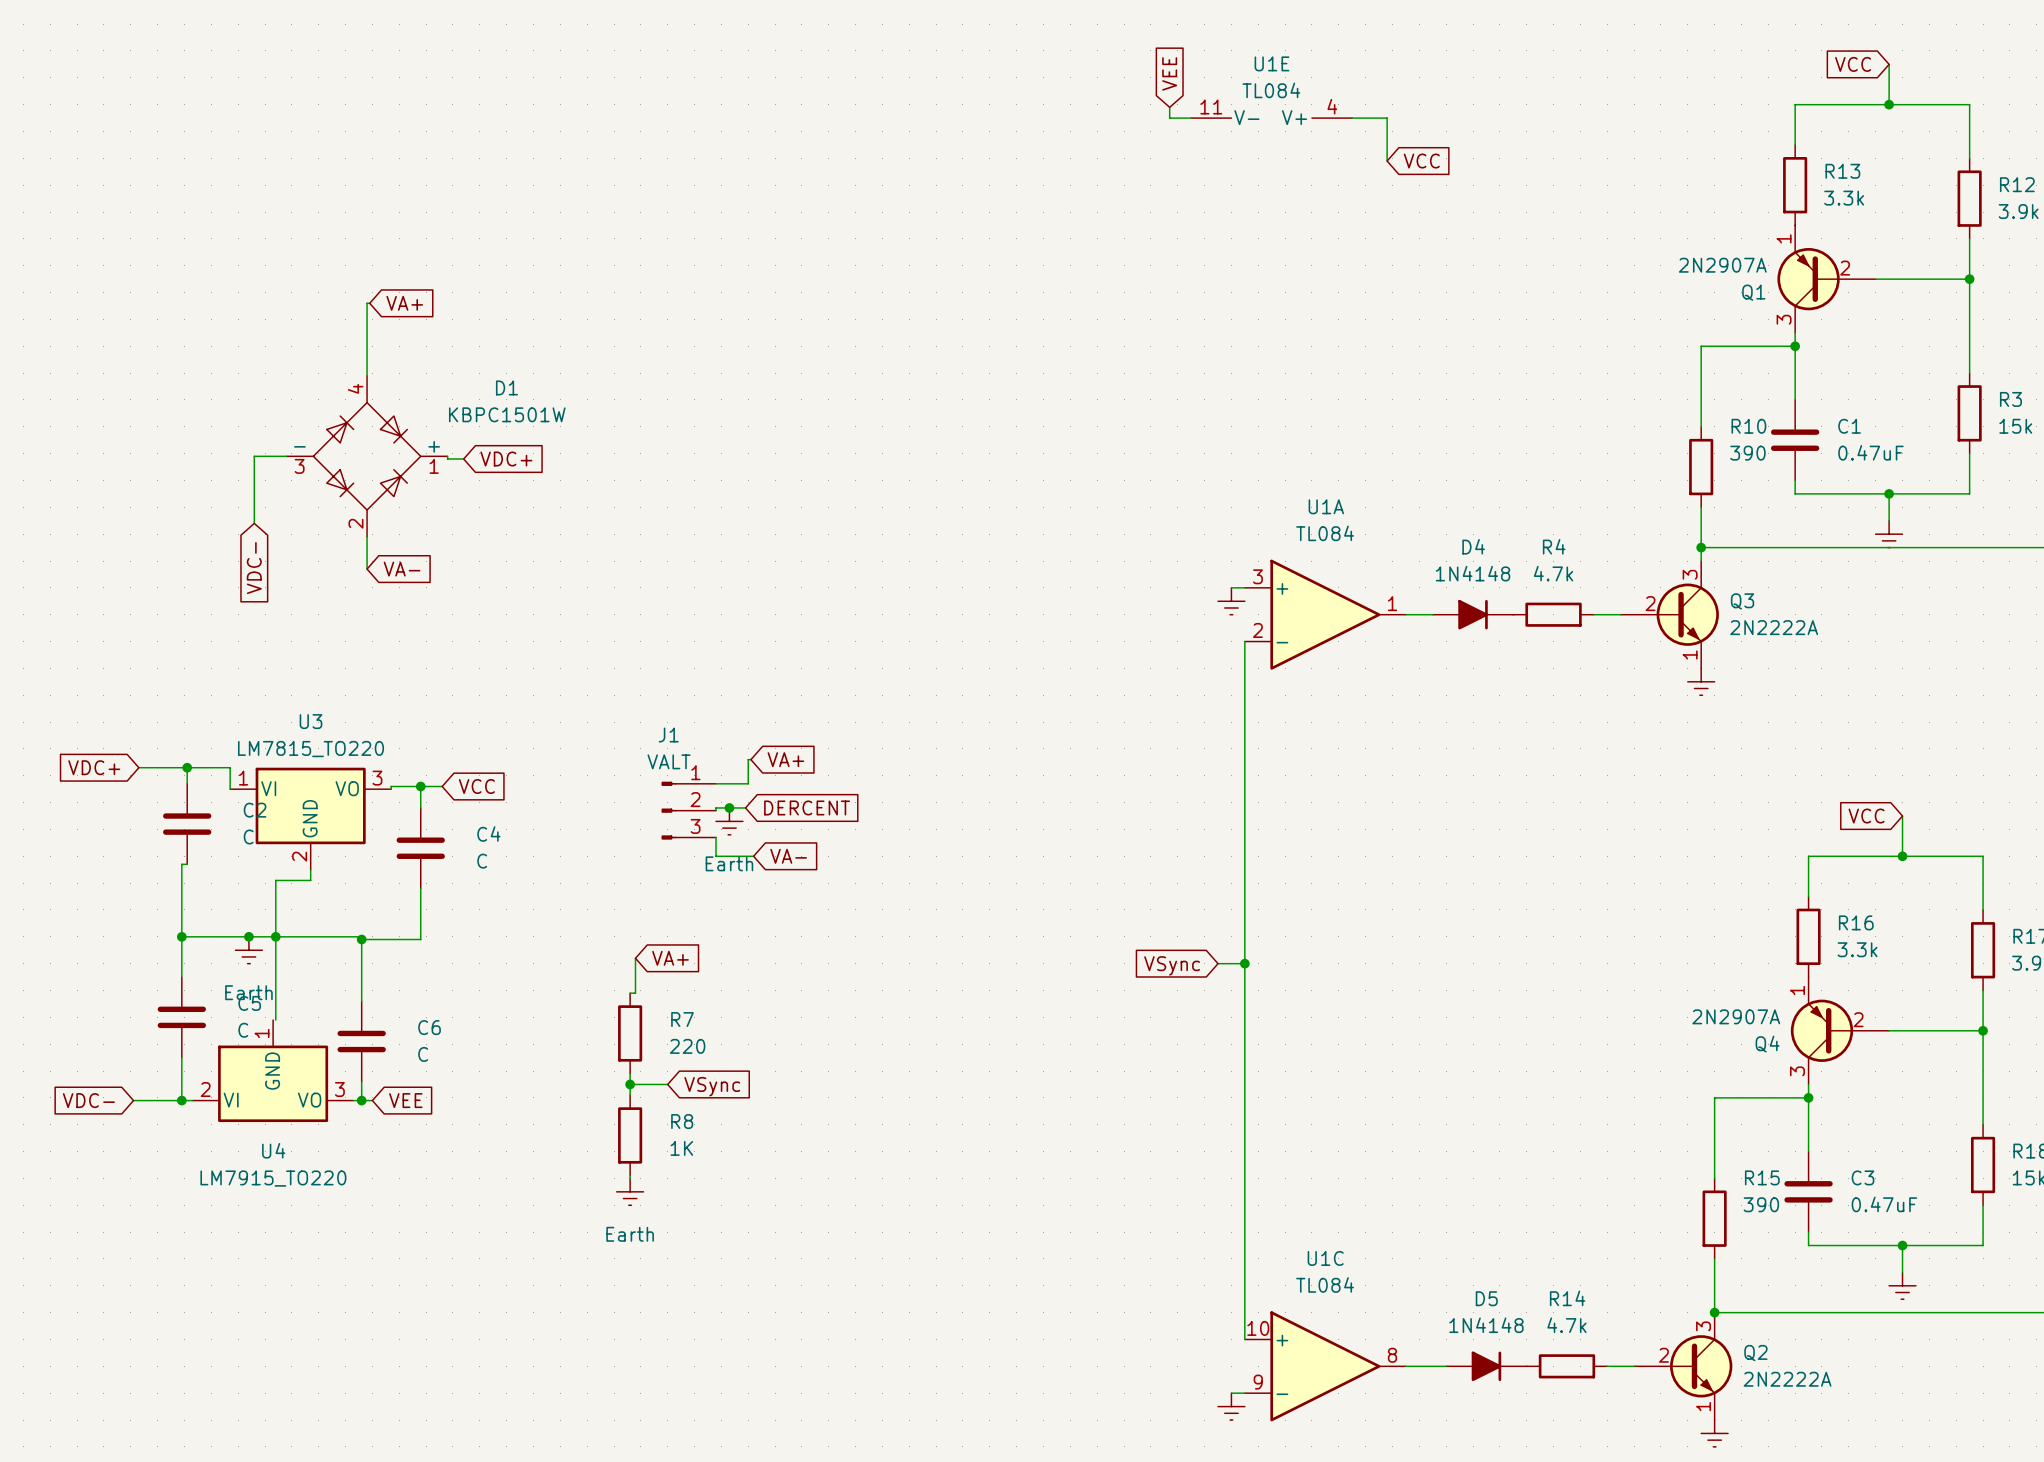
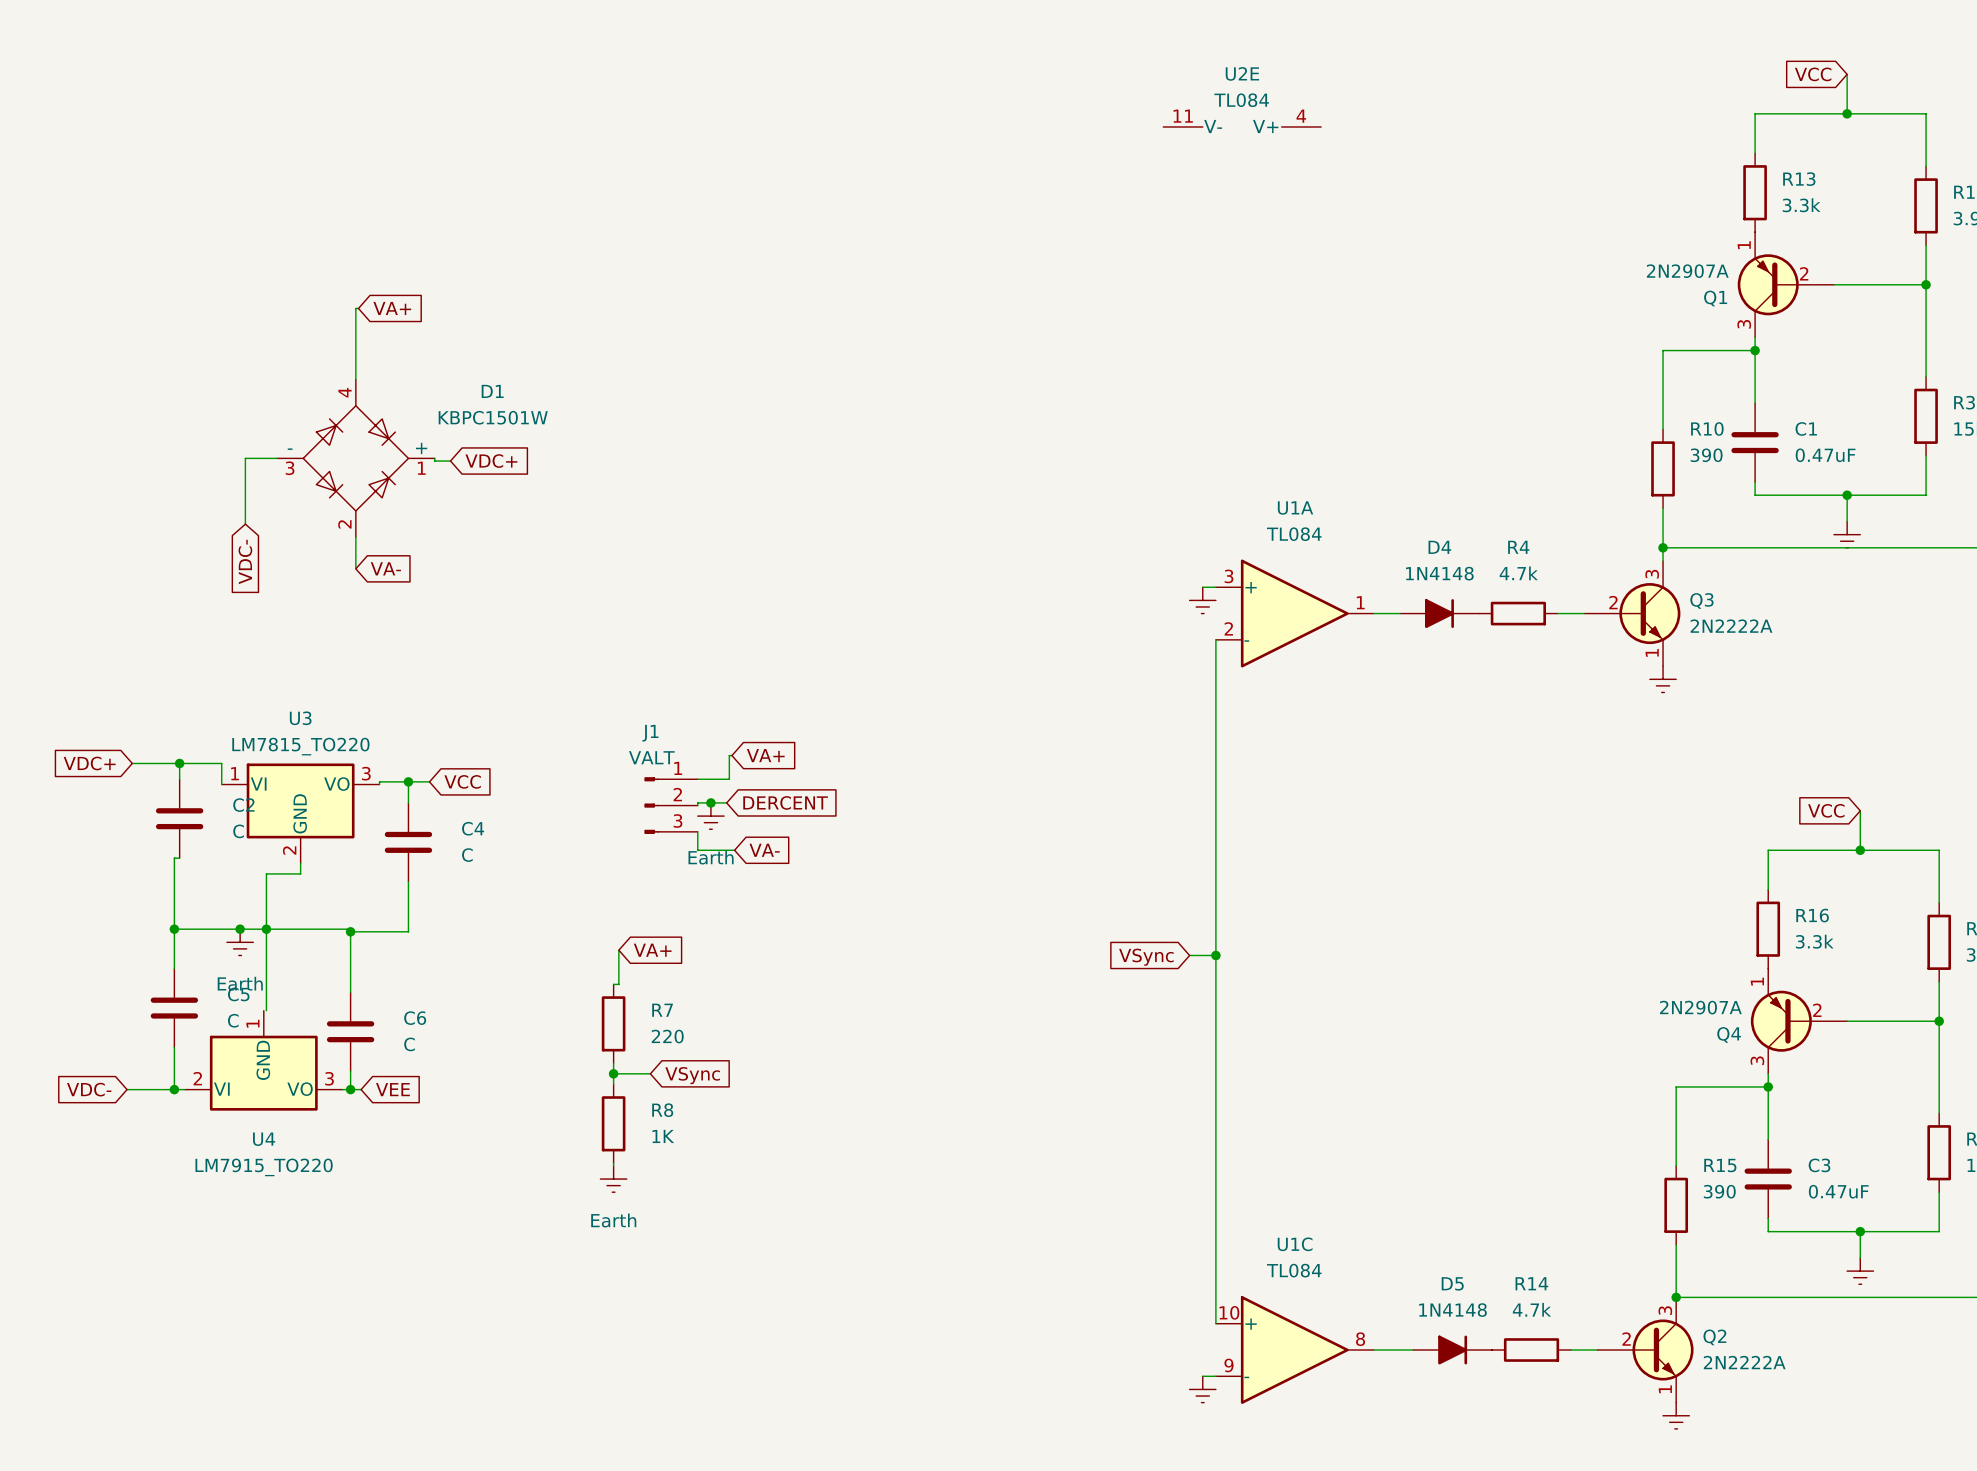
U1E name: U1E (1272, 63) -> U2E (1242, 73)
global label: VEE (1169, 73) -> none
wire: (1169, 107) (1169, 118) (1191, 118) -> none
wire: (1352, 118) (1387, 118) (1387, 161) -> none
global label: VCC (1421, 161) -> none

